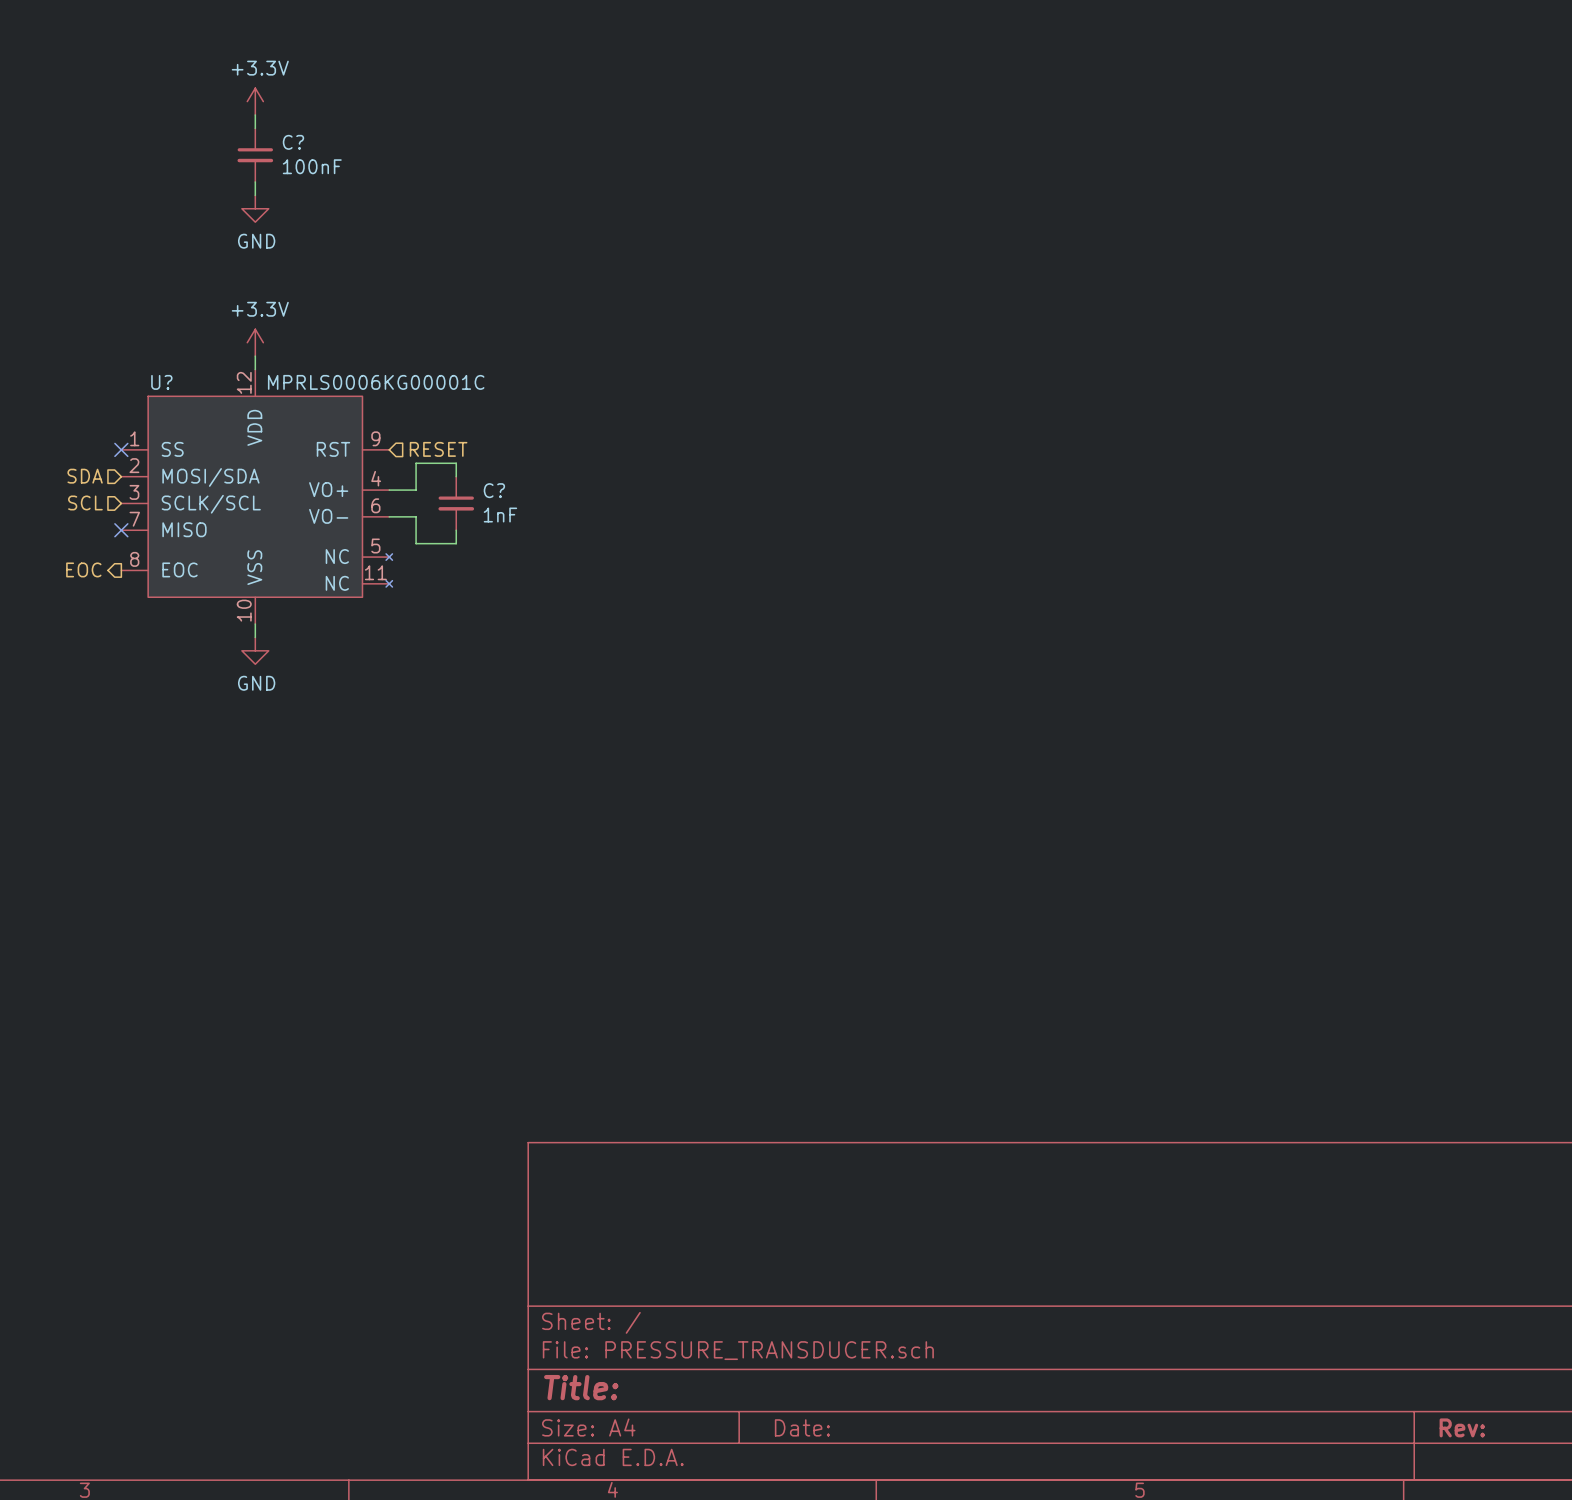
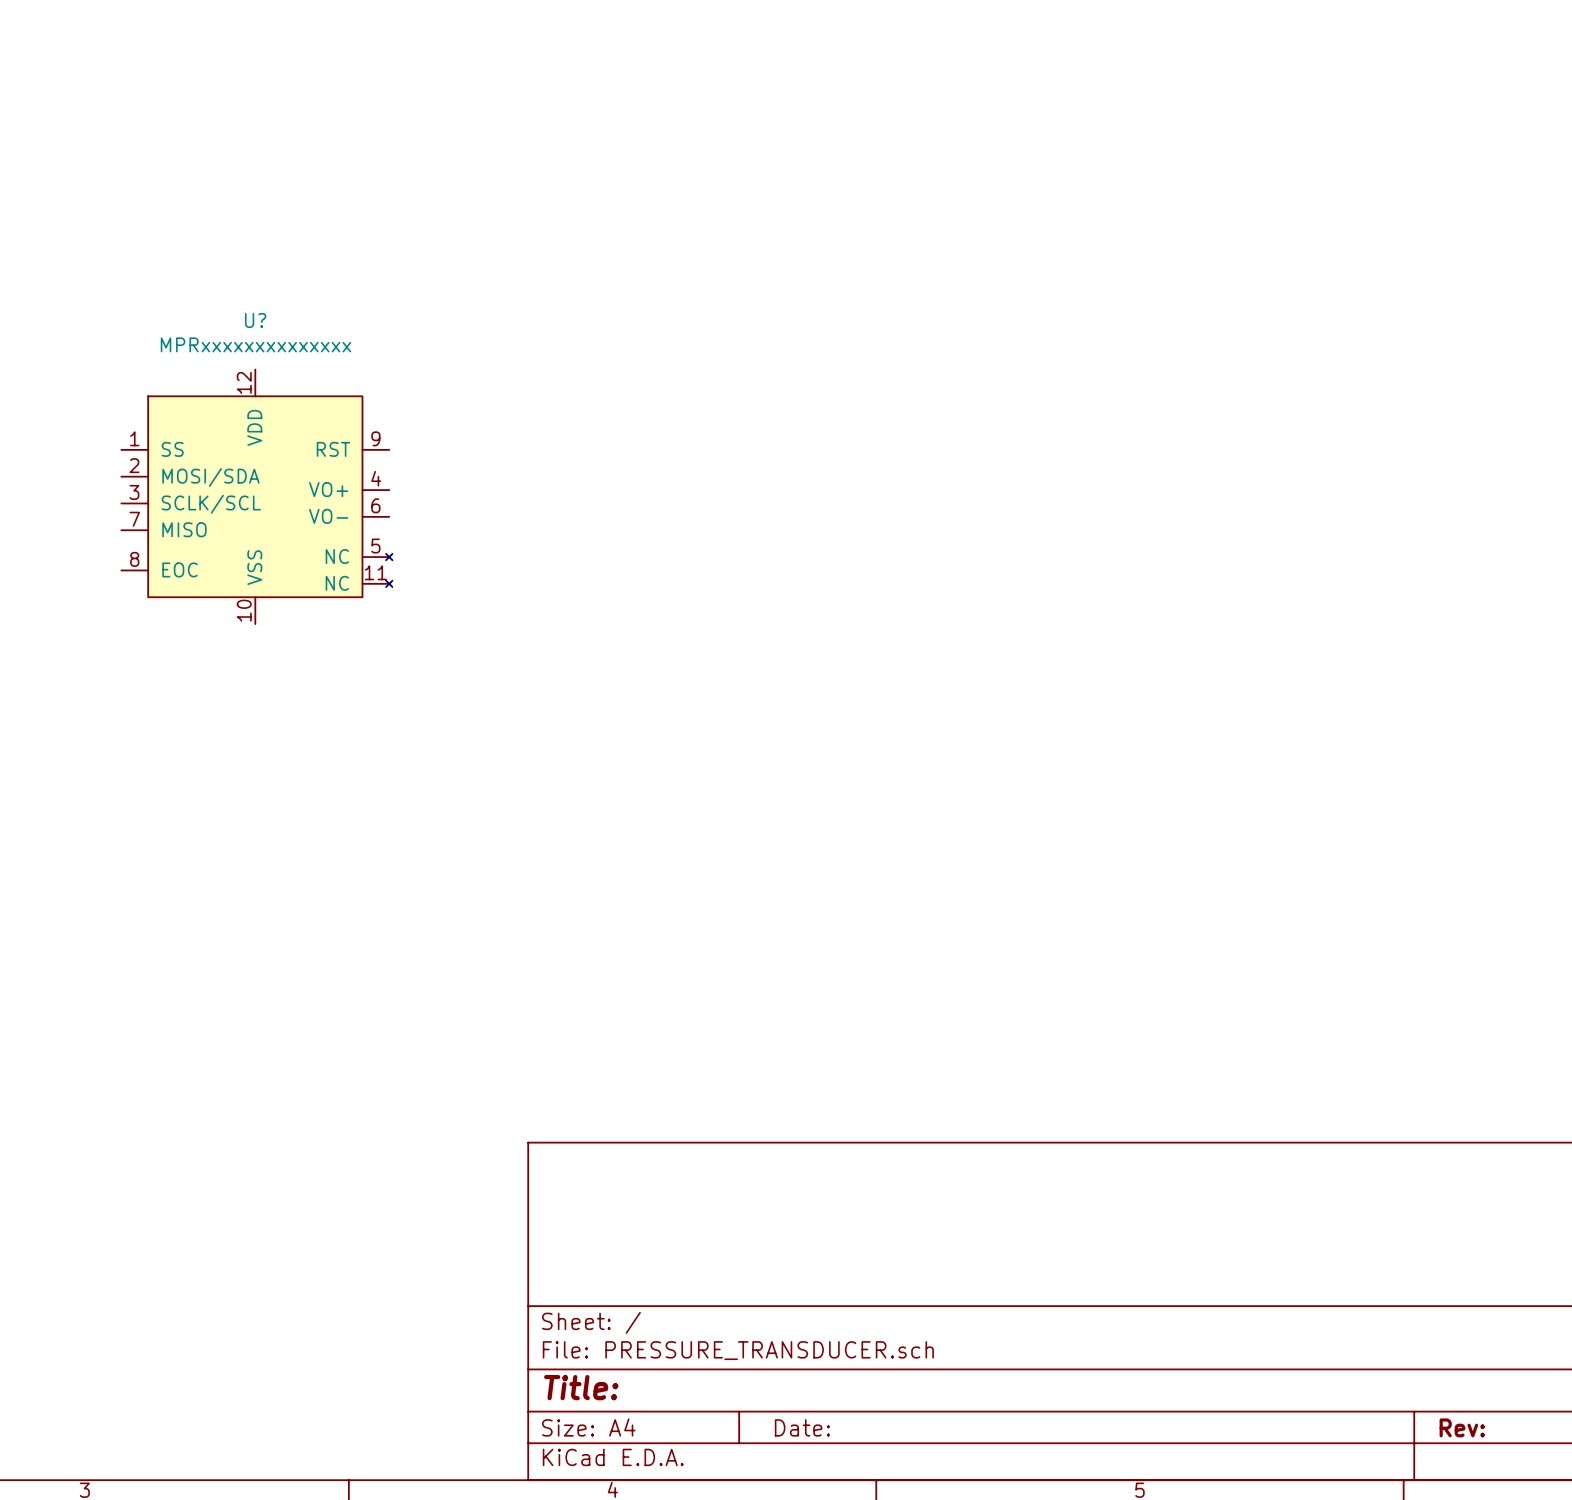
power symbol: +3.3V (255, 101) -> none
wire: (255, 114) (255, 128) -> none
C?: 100nF (255, 155) -> none
wire: (255, 181) (255, 195) -> none
power symbol: GND (255, 208) -> none
power symbol: +3.3V (255, 342) -> none
wire: (255, 356) (255, 369) -> none
U? name position: U? (161, 382) -> U? (255, 320)
U? value: MPRLS0006KG00001C (376, 382) -> MPRxxxxxxxxxxxxxx (255, 344)
no-connect mark: (121, 449) -> none
hierarchical label: RESET (438, 449) -> none
hierarchical label: SDA (85, 476) -> none
wire: (456, 476) (456, 463) (416, 463) (416, 490) (389, 490) -> none
hierarchical label: SCL (85, 502) -> none
C?: 1nF (456, 503) -> none
wire: (389, 516) (416, 516) (416, 543) (456, 543) (456, 530) -> none
no-connect mark: (121, 530) -> none
hierarchical label: EOC (83, 569) -> none
wire: (255, 624) (255, 637) -> none
power symbol: GND (255, 650) -> none

